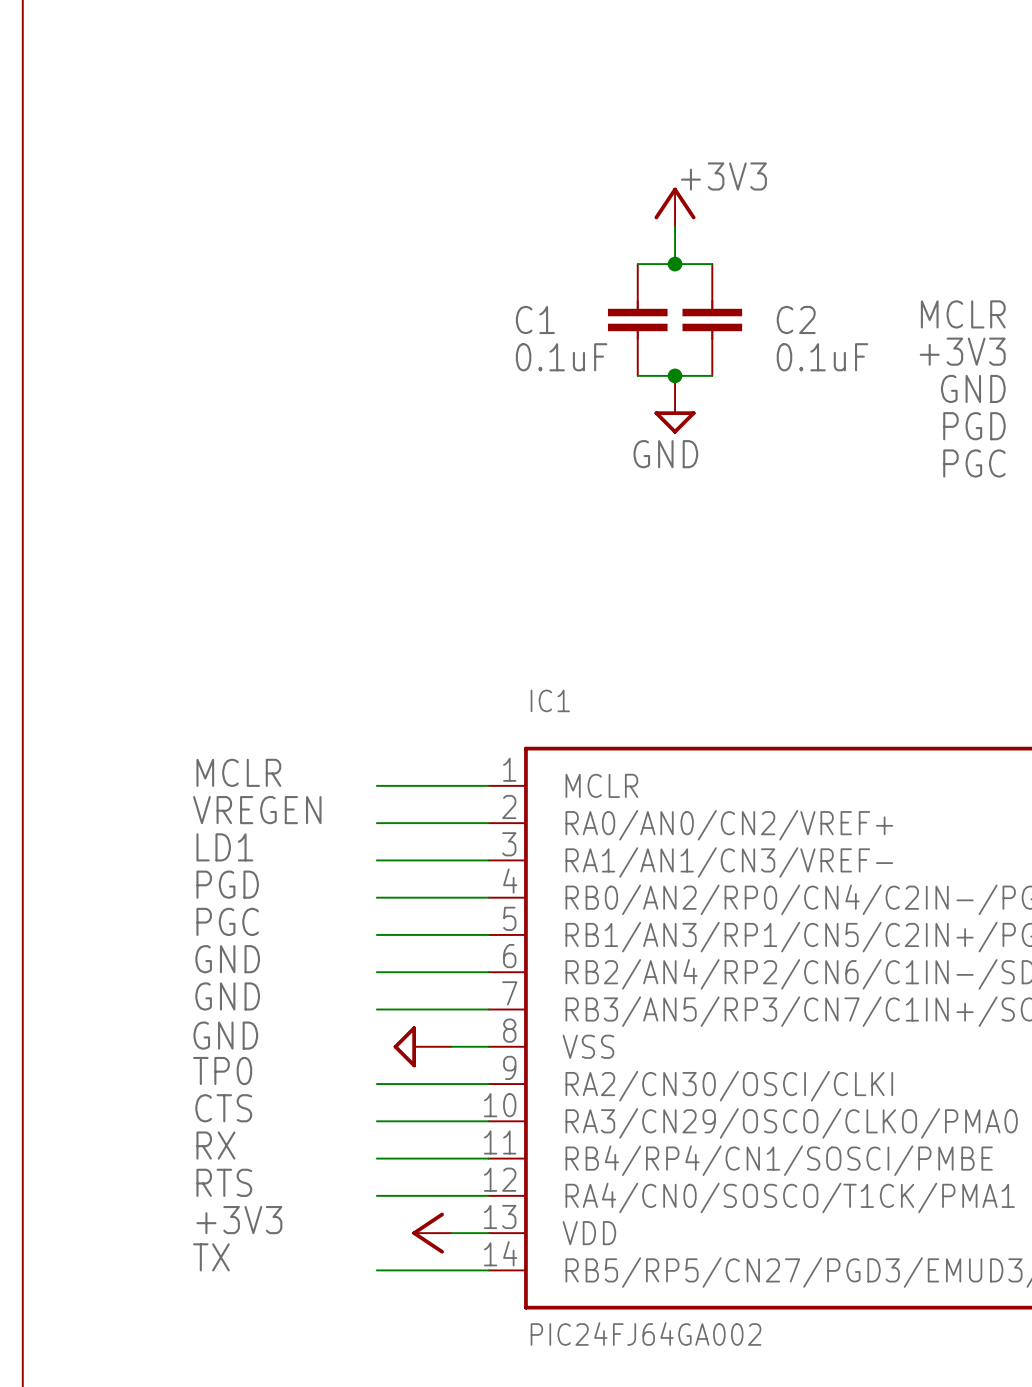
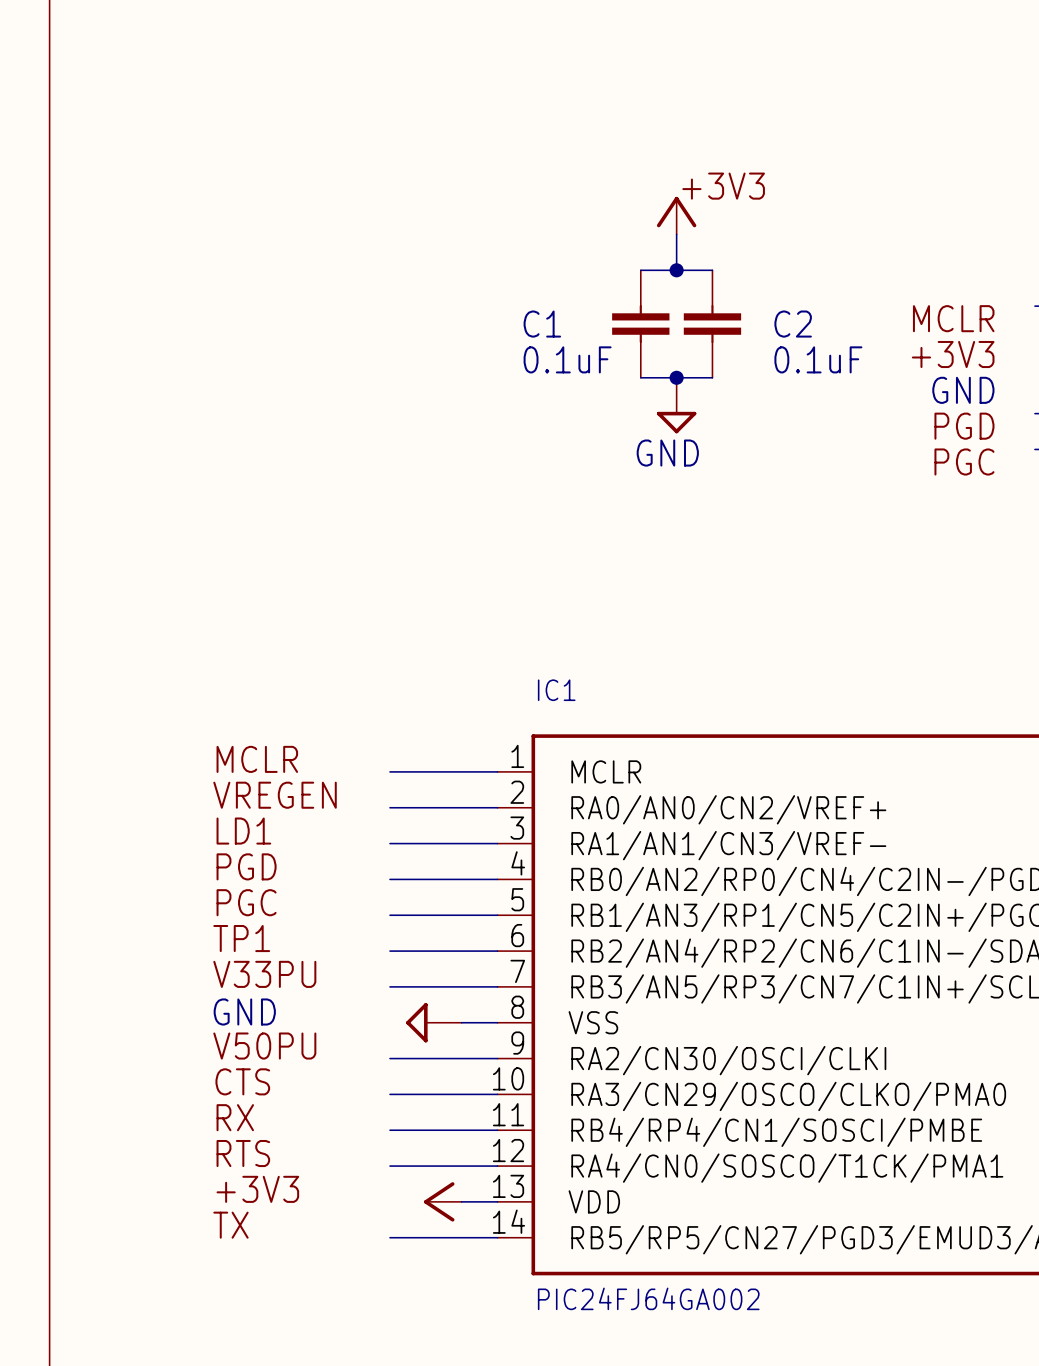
label: GND (227, 959) -> TP1 (241, 938)
label: GND (227, 996) -> V33PU (264, 974)
label: TP0 (222, 1071) -> V50PU (264, 1046)

